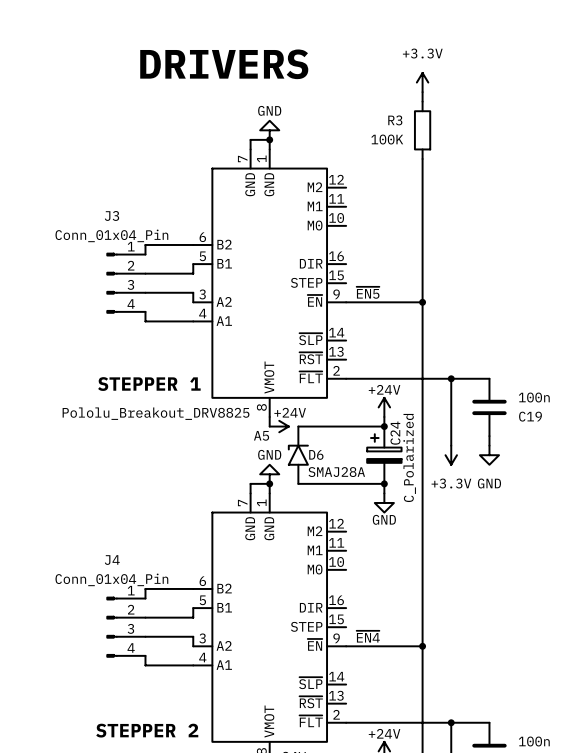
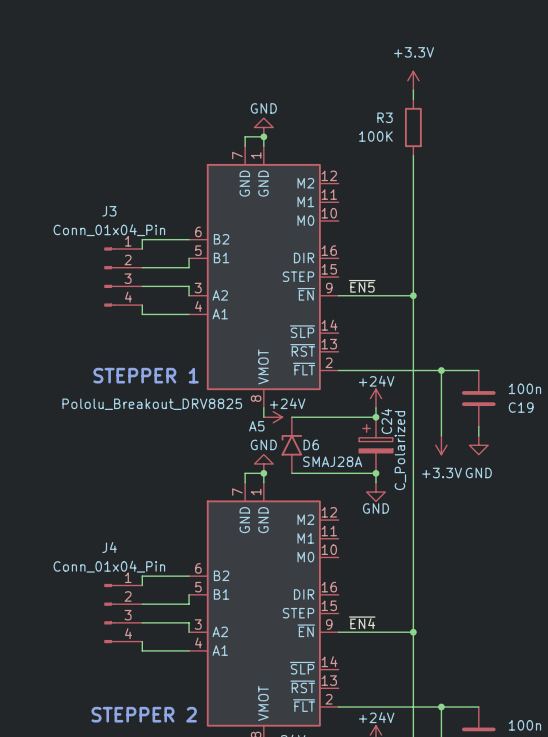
text: DRIVERS (224, 64) -> none

